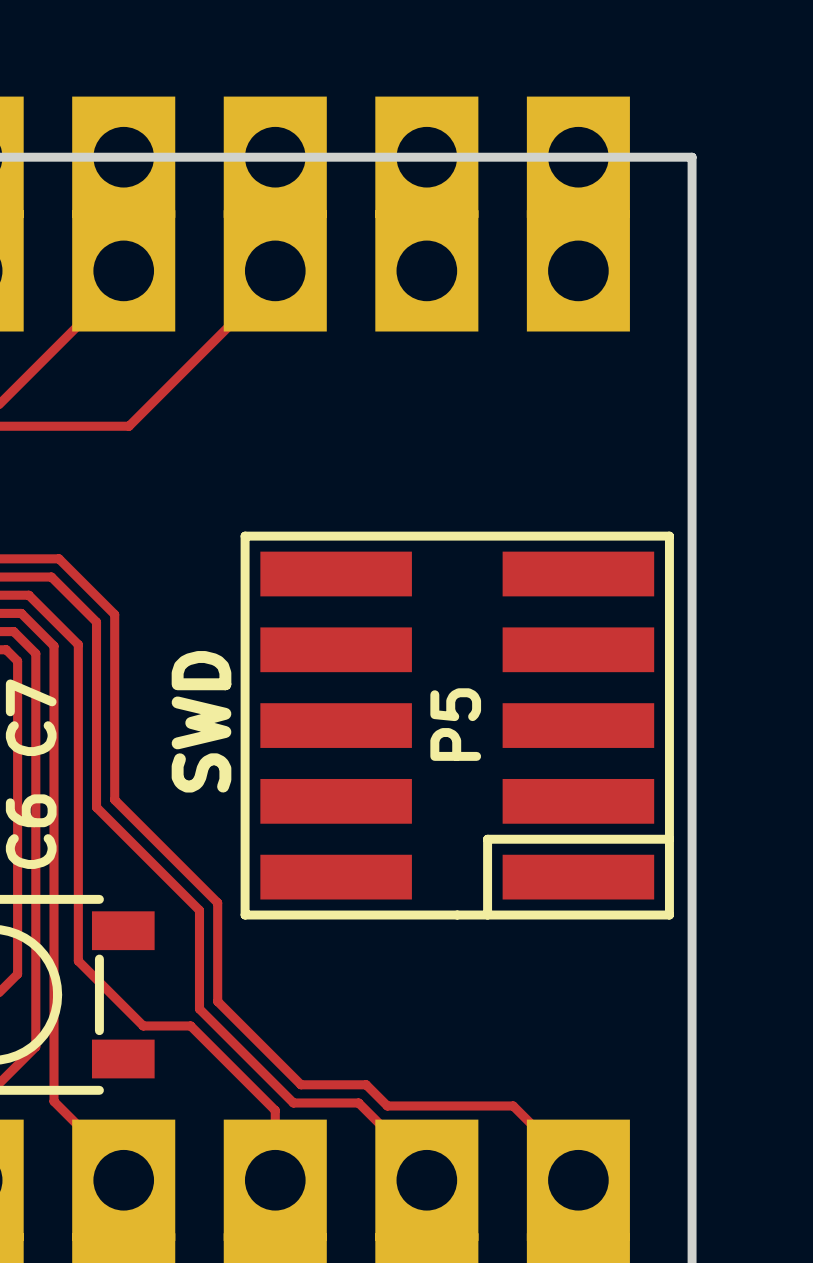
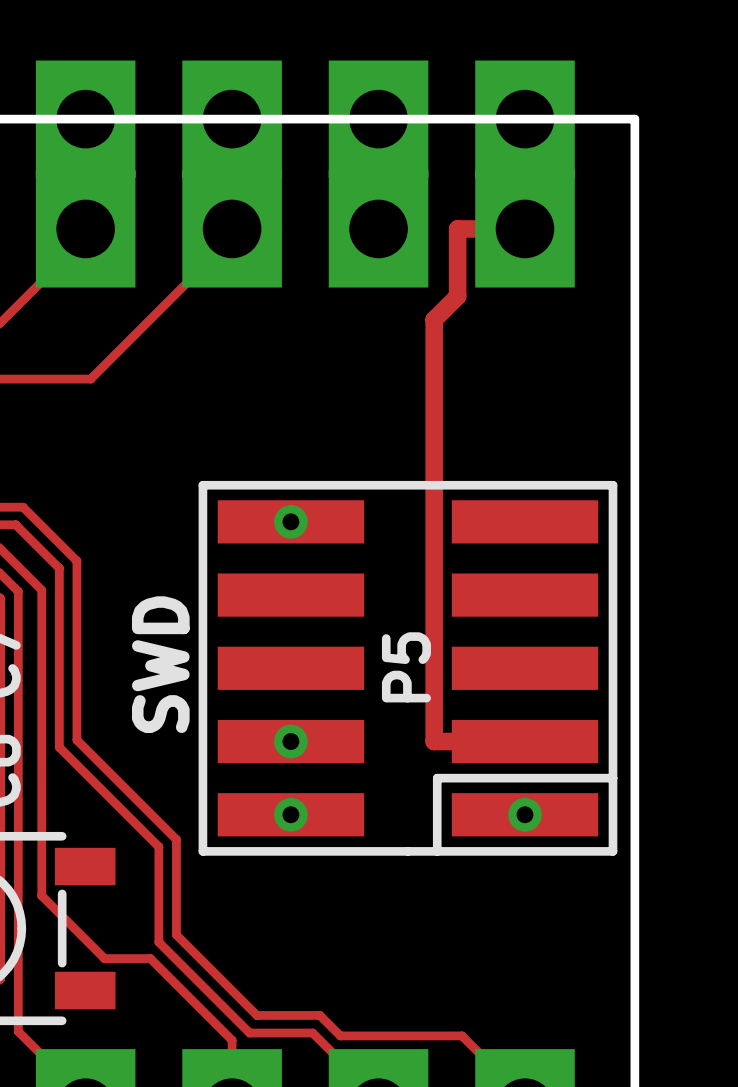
track: none -> (525, 228) (457, 228) (457, 296) (434, 319) (434, 741) (525, 741)
via: none -> (290, 521)
via: none -> (290, 741)
via: none -> (290, 814)
via: none -> (525, 814)

